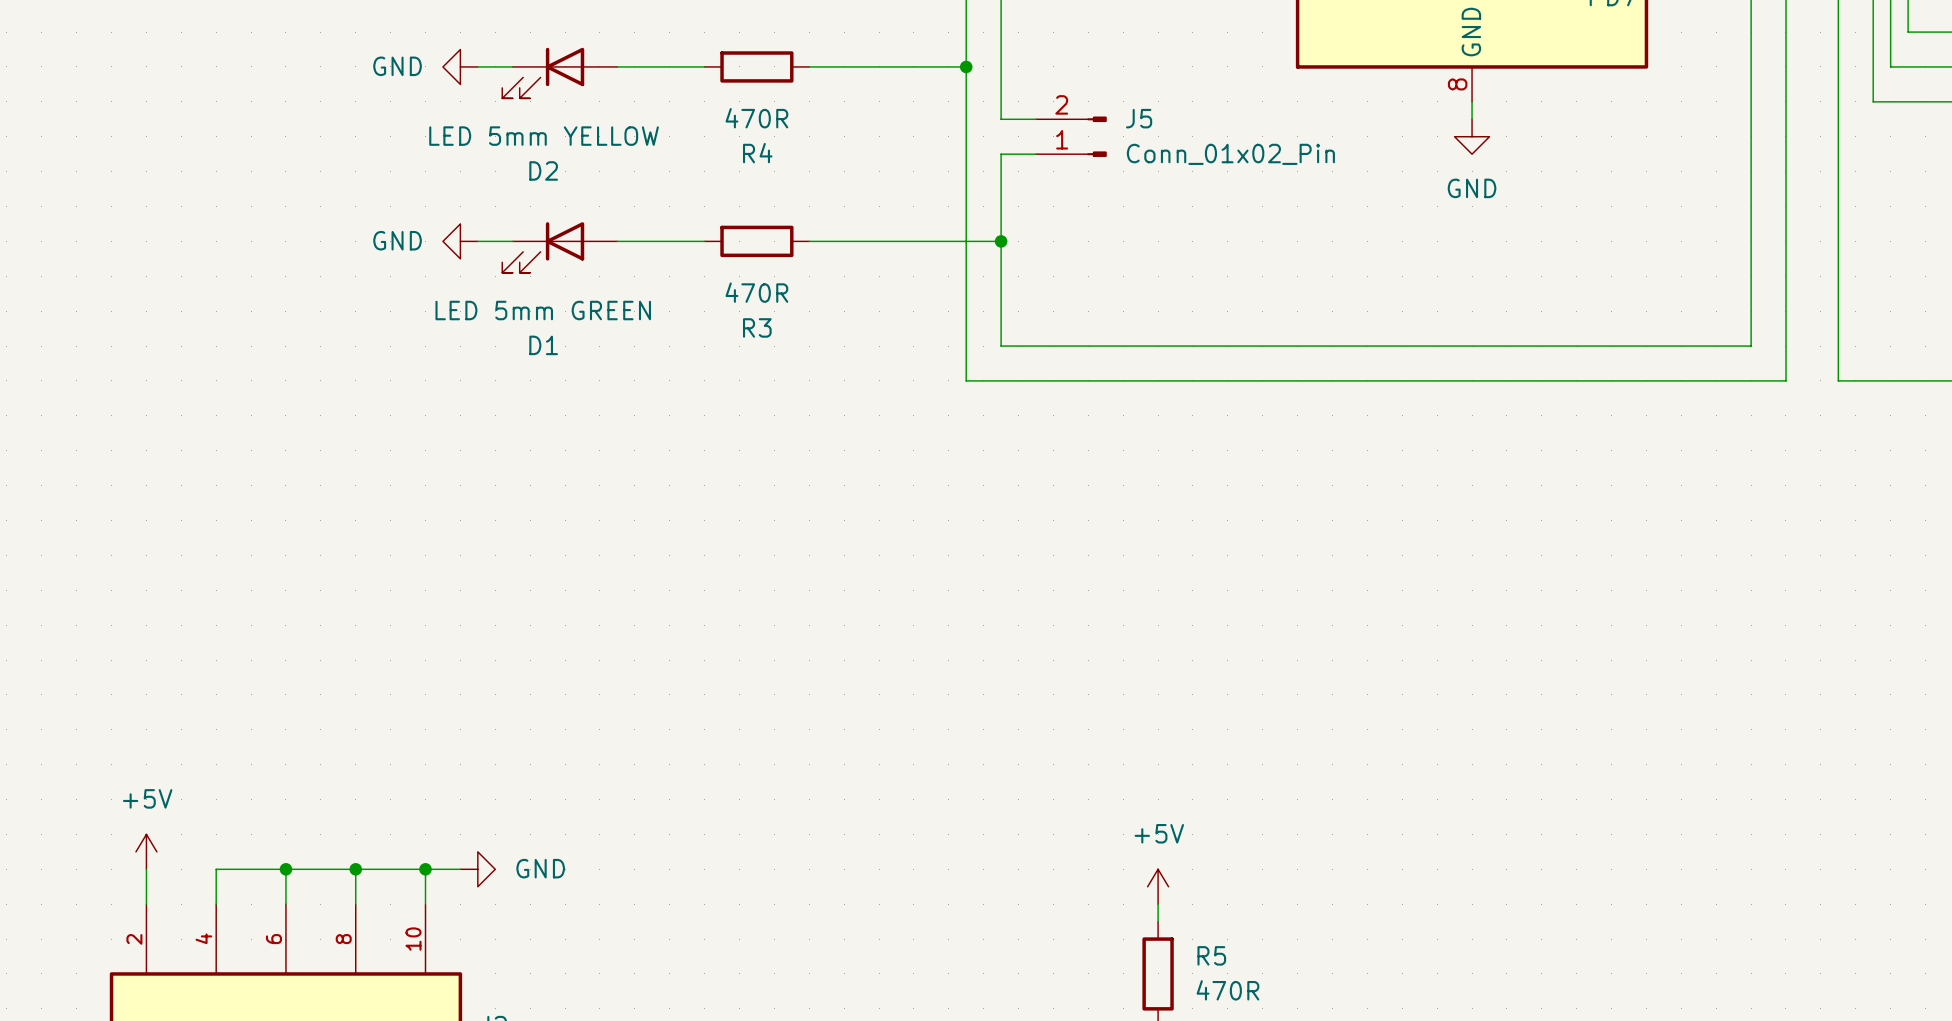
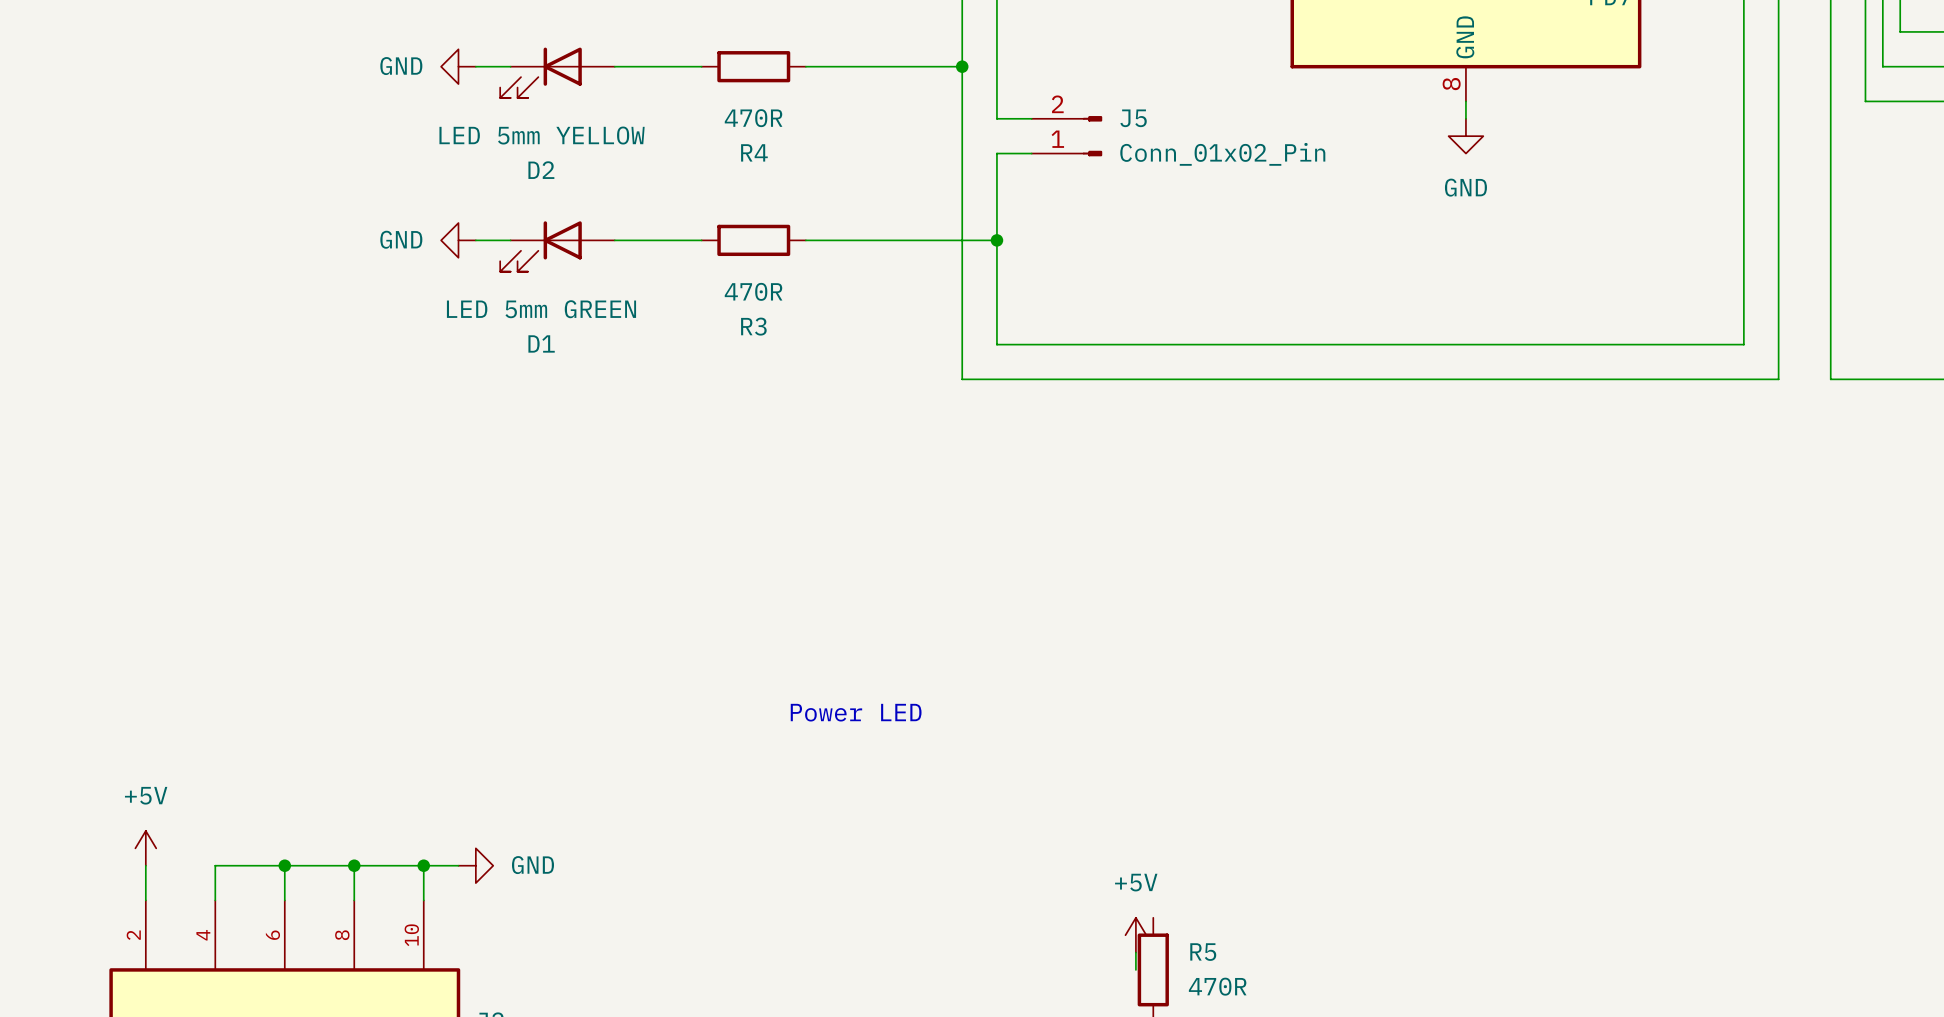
text: none -> Power LED (856, 712)
power symbol position: +5V (1158, 886) -> +5V (1135, 935)
wire: (1158, 904) (1158, 921) -> (1135, 952) (1135, 969)

